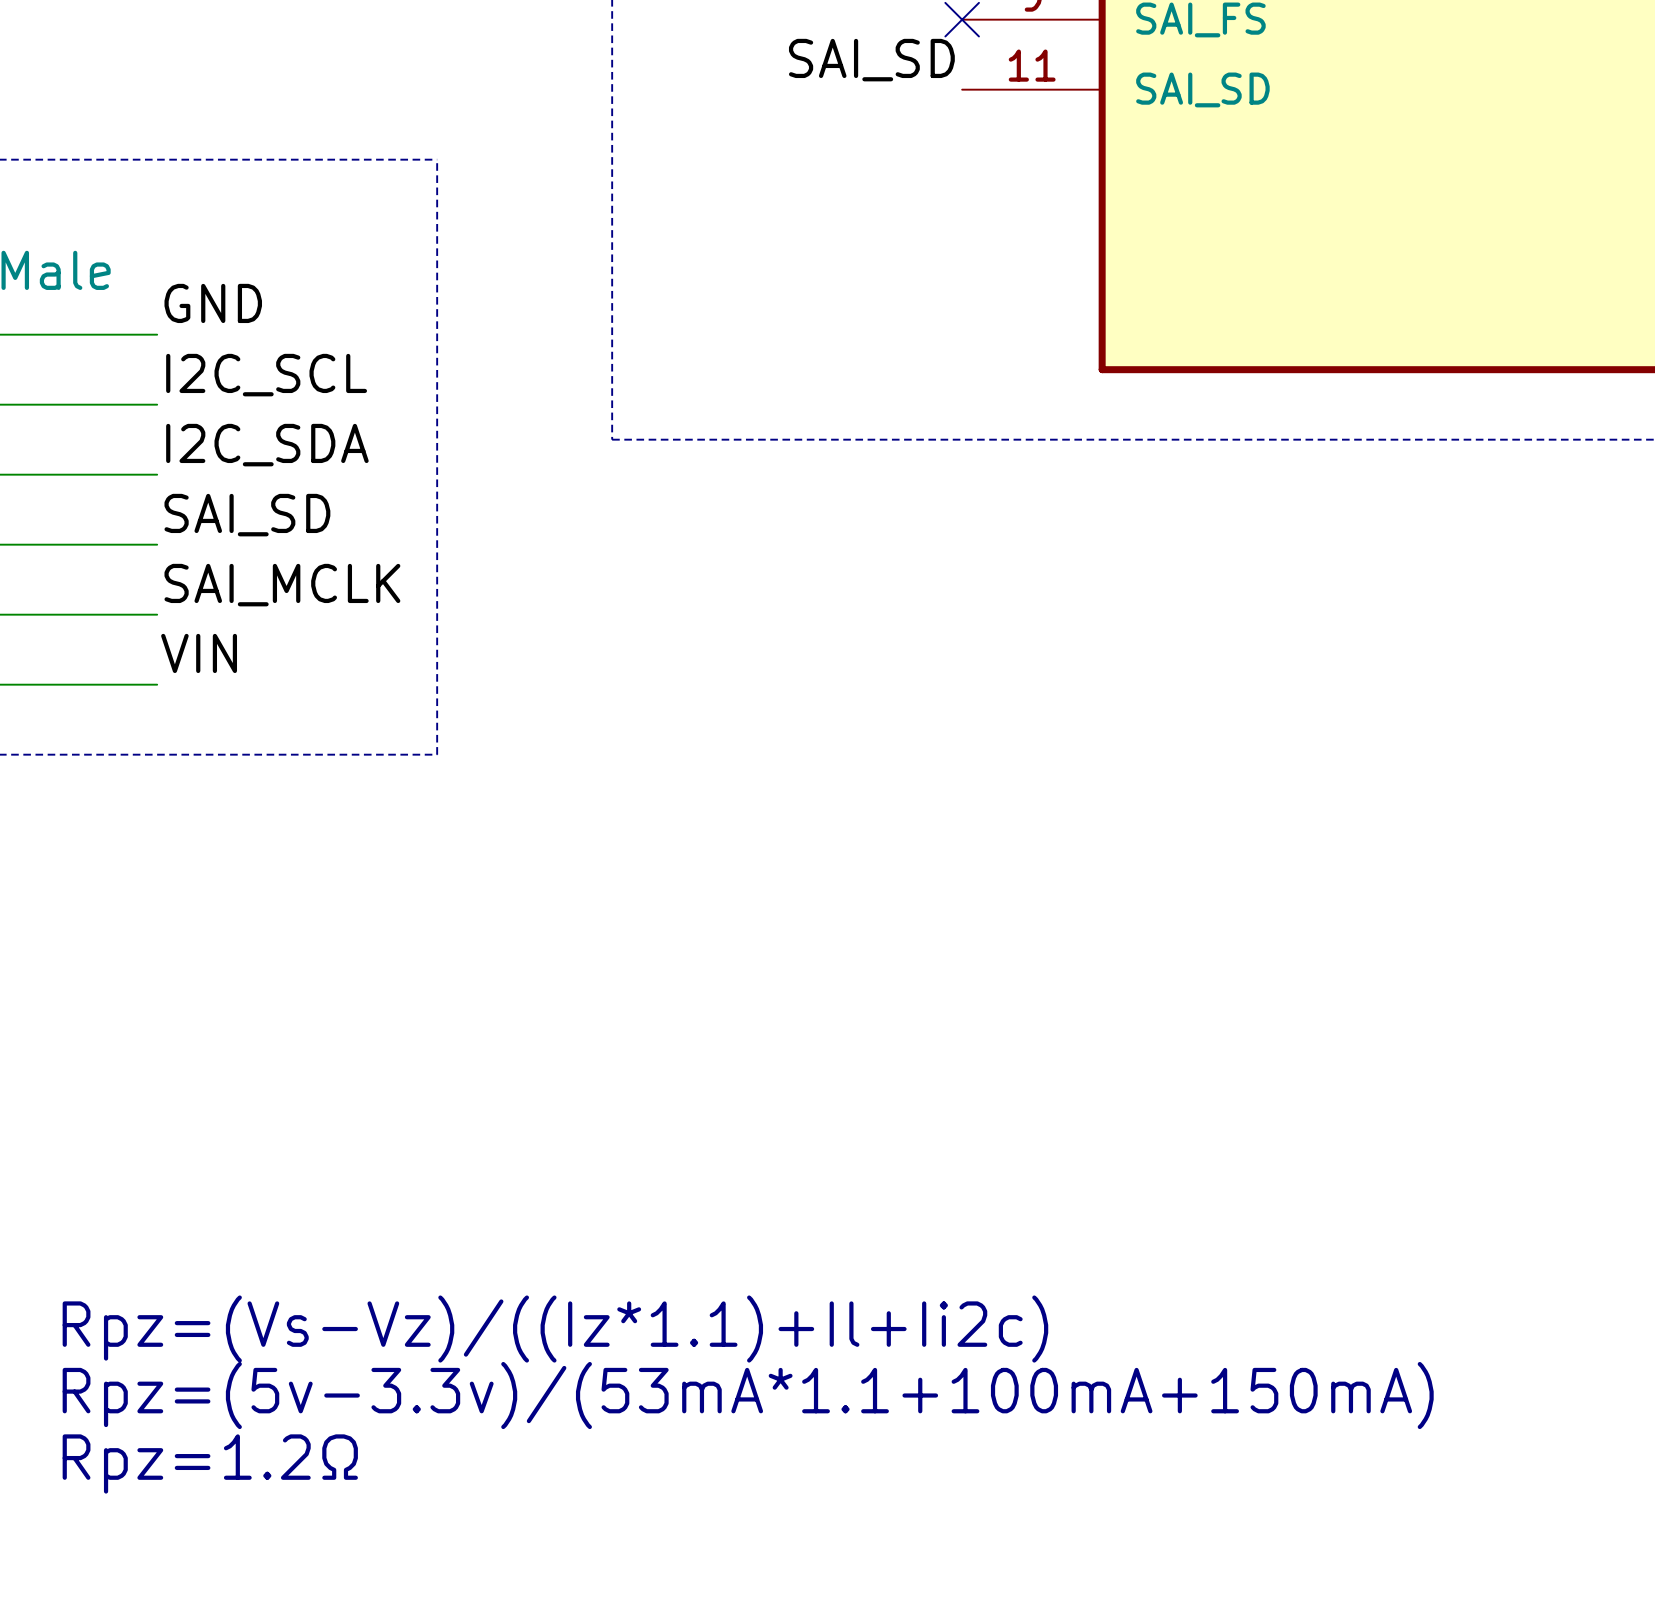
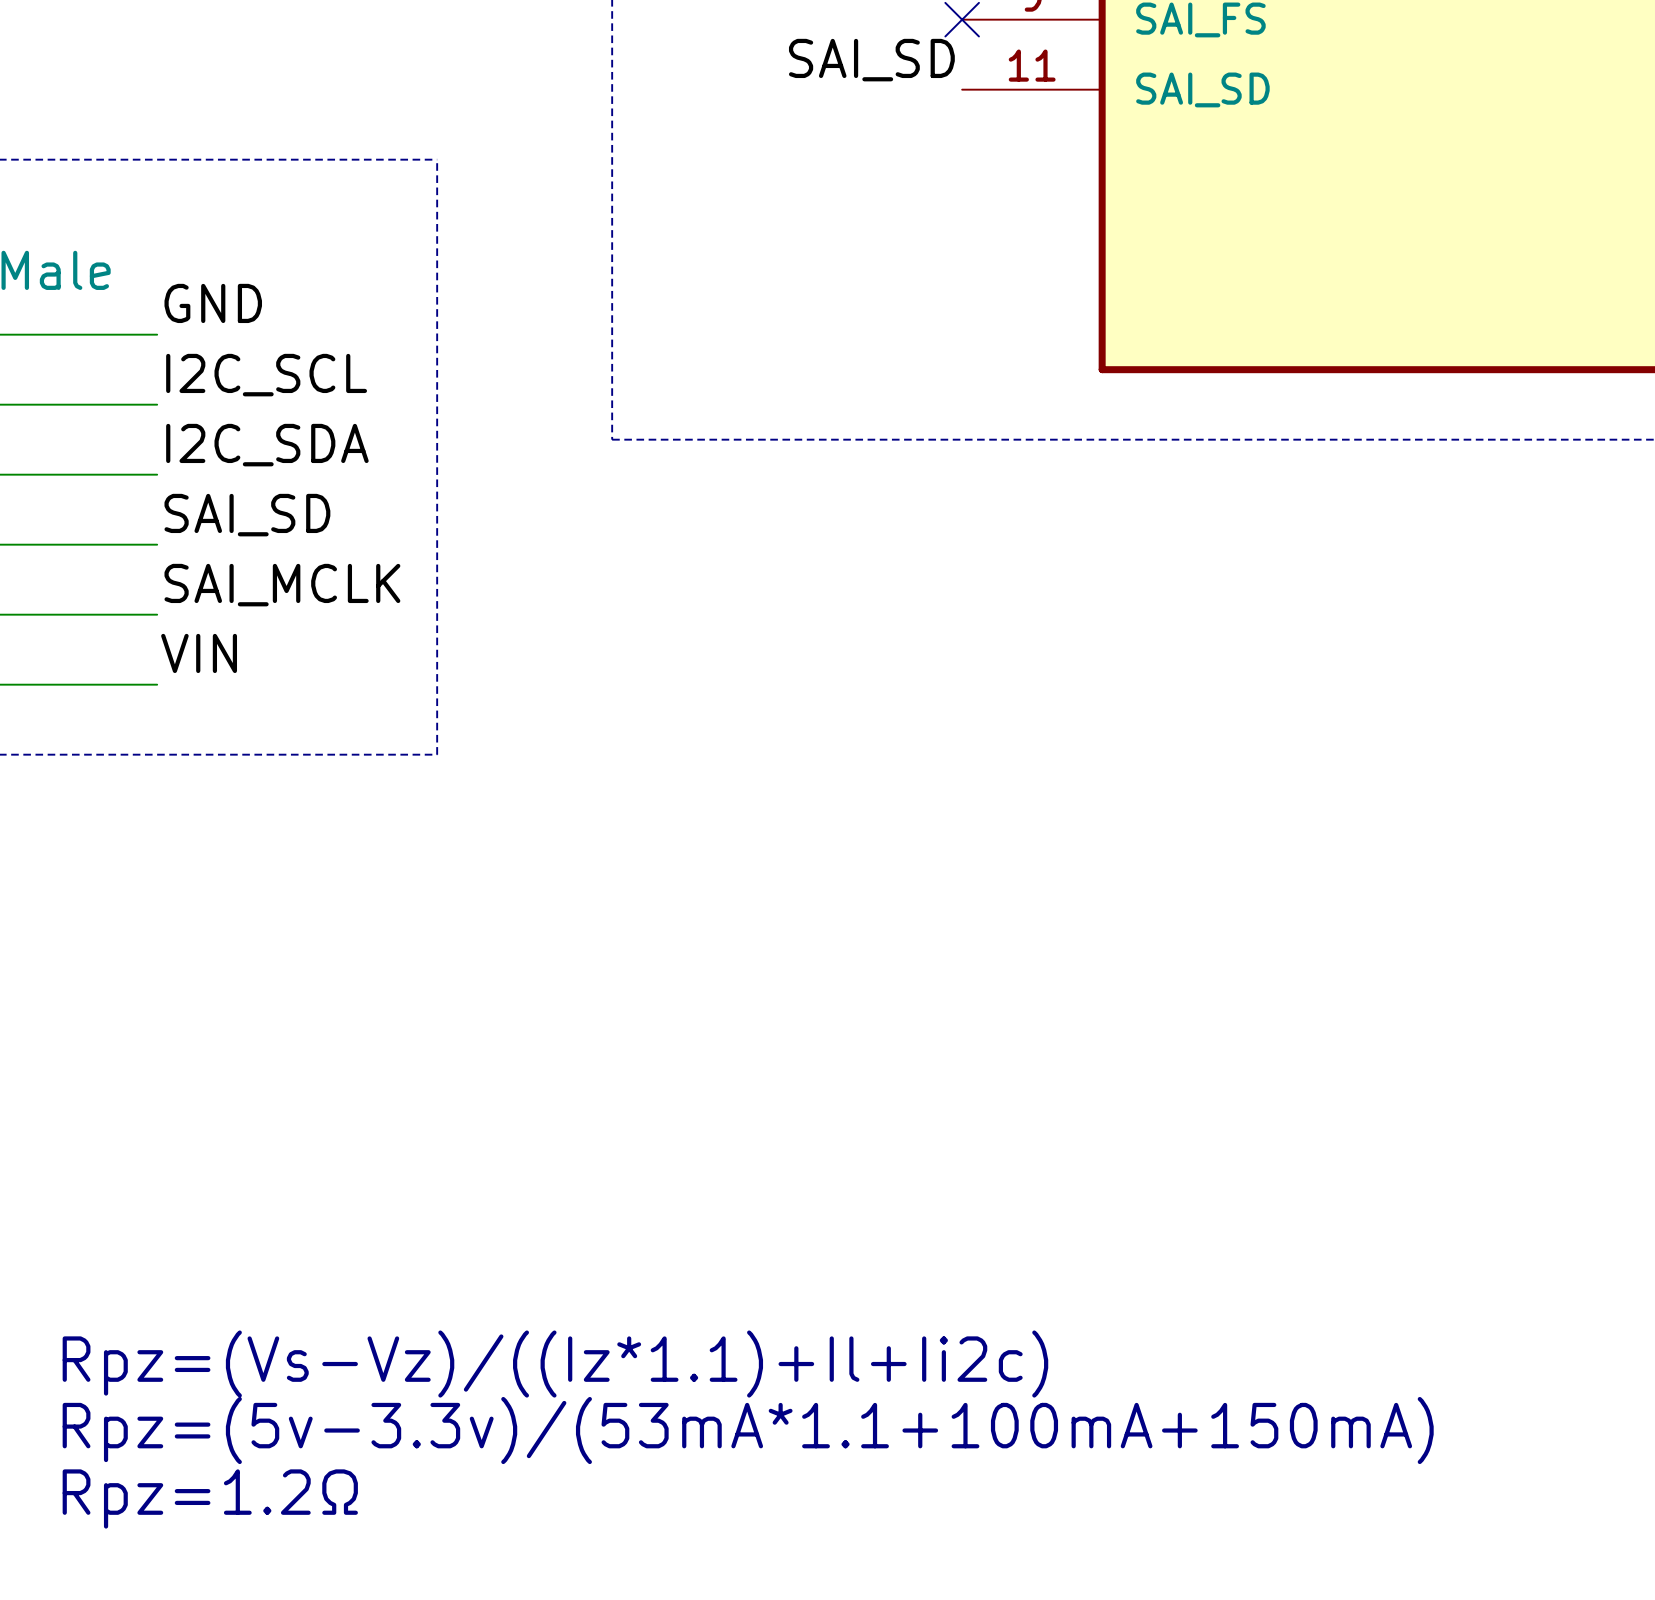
text position: Rpz=(Vs-Vz)/((Iz*1.1)+Il+Ii2c) (555, 1329) -> Rpz=(Vs-Vz)/((Iz*1.1)+Il+Ii2c) (555, 1364)
text position: Rpz=(5v-3.3v)/(53mA*1.1+100mA+150mA) (748, 1395) -> Rpz=(5v-3.3v)/(53mA*1.1+100mA+150mA) (748, 1430)
text position: Rpz=1.2Ω (210, 1463) -> Rpz=1.2Ω (210, 1498)

